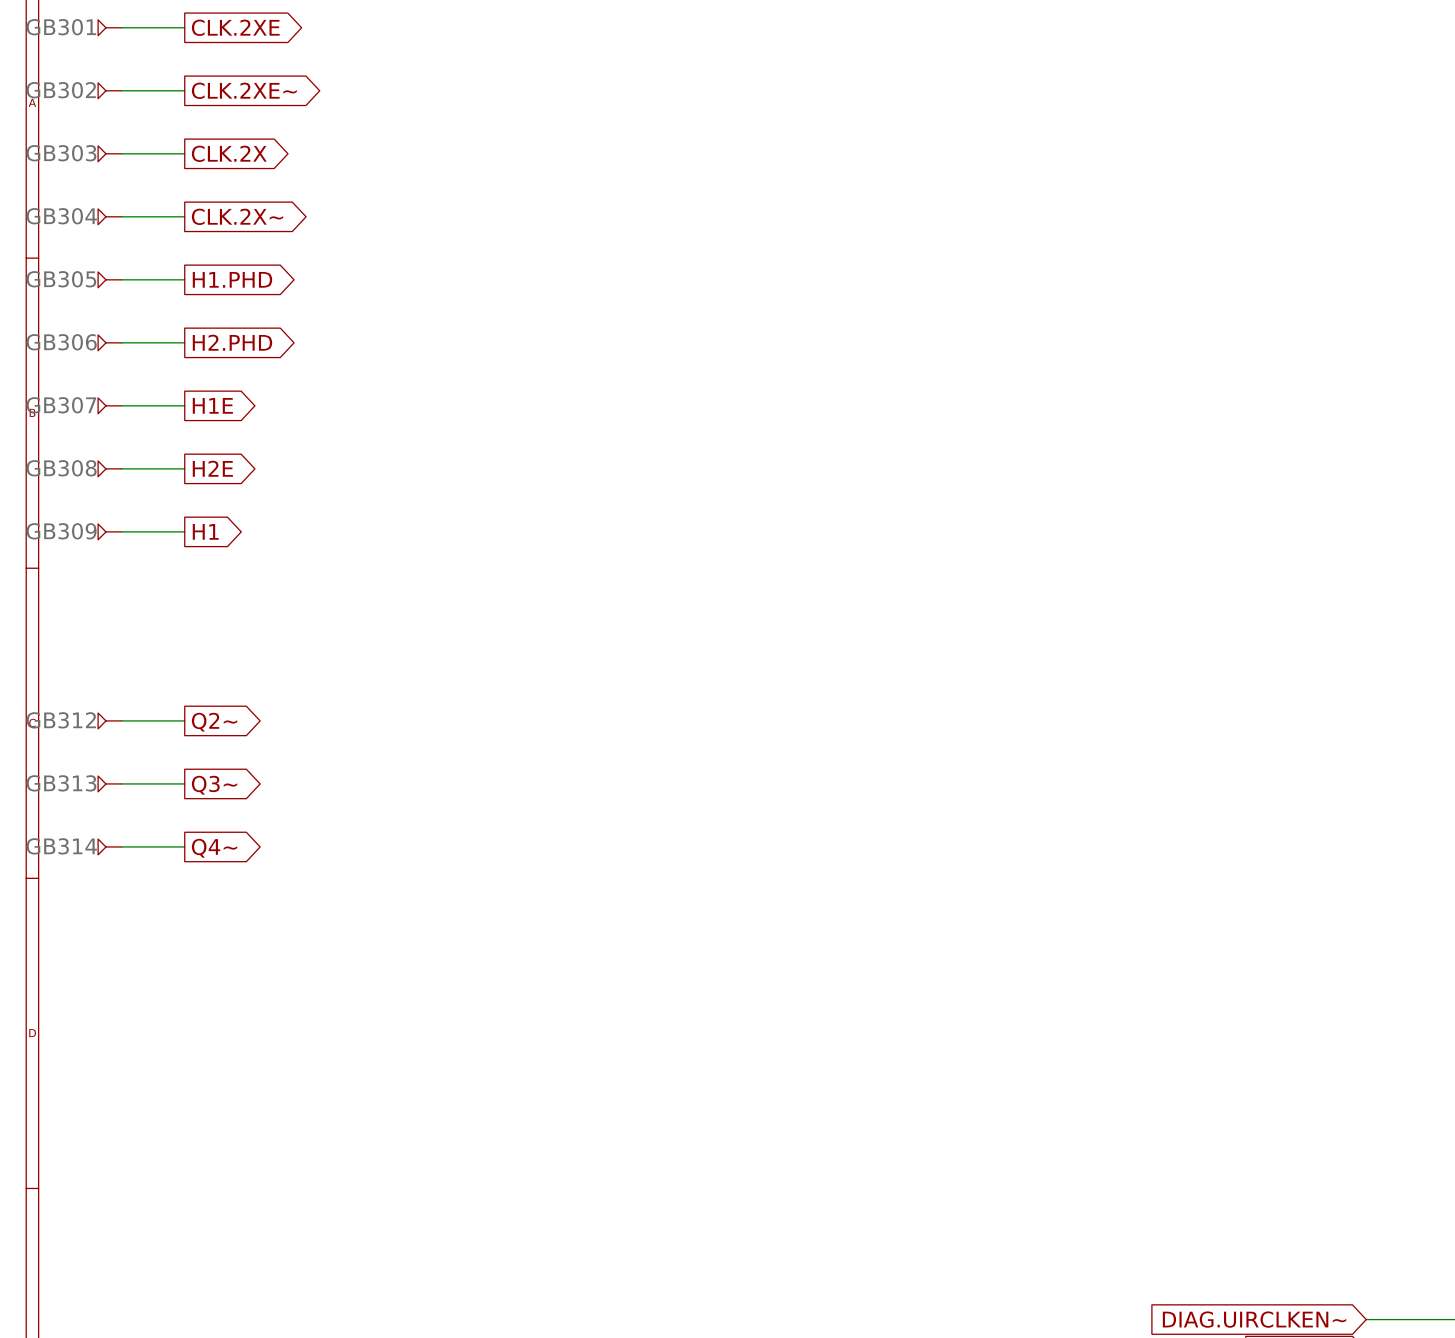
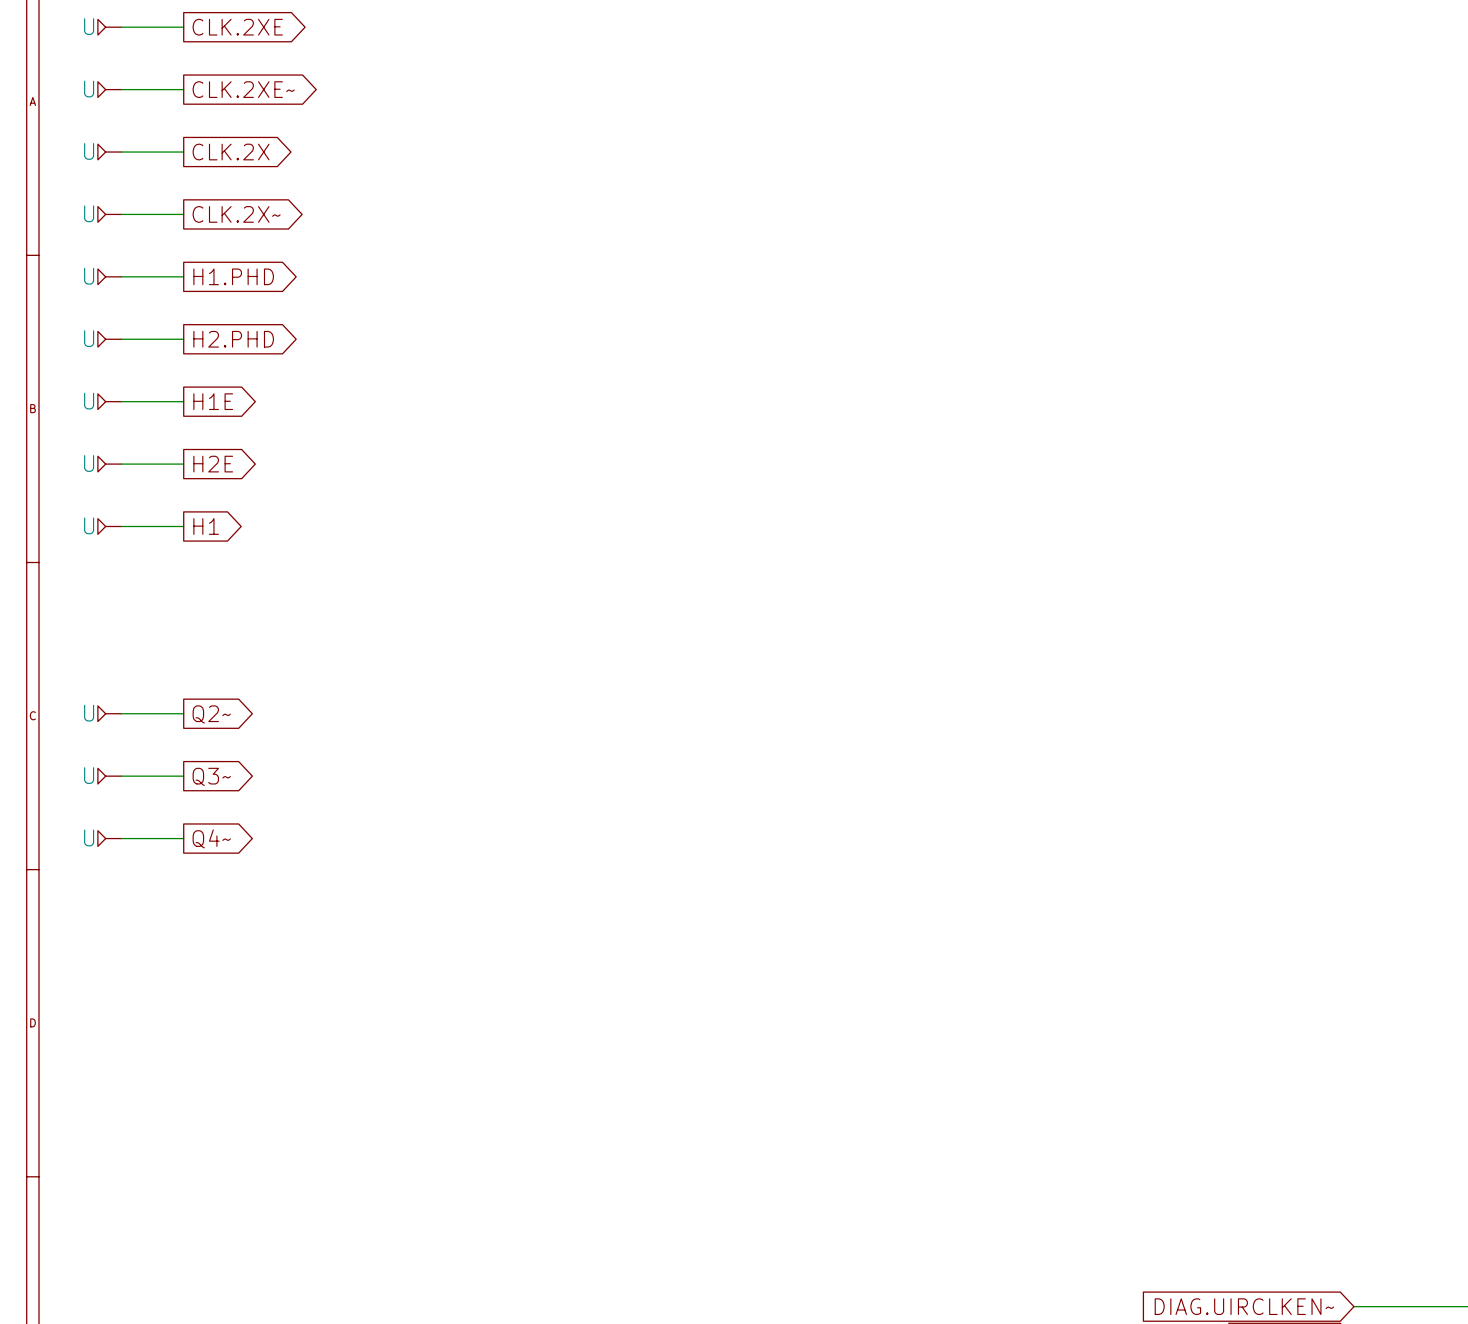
GB301 name: GB301 (61, 27) -> U (89, 26)
GB302 name: GB302 (61, 90) -> U (89, 89)
GB303 name: GB303 (61, 153) -> U (89, 151)
GB304 name: GB304 (61, 216) -> U (89, 213)
GB305 name: GB305 (61, 279) -> U (89, 276)
GB306 name: GB306 (61, 342) -> U (89, 338)
GB307 name: GB307 (61, 405) -> U (89, 401)
GB308 name: GB308 (61, 468) -> U (89, 463)
GB309 name: GB309 (61, 531) -> U (89, 525)
GB312 name: GB312 (61, 720) -> U (89, 713)
GB313 name: GB313 (61, 783) -> U (89, 775)
GB314 name: GB314 (61, 846) -> U (89, 837)

